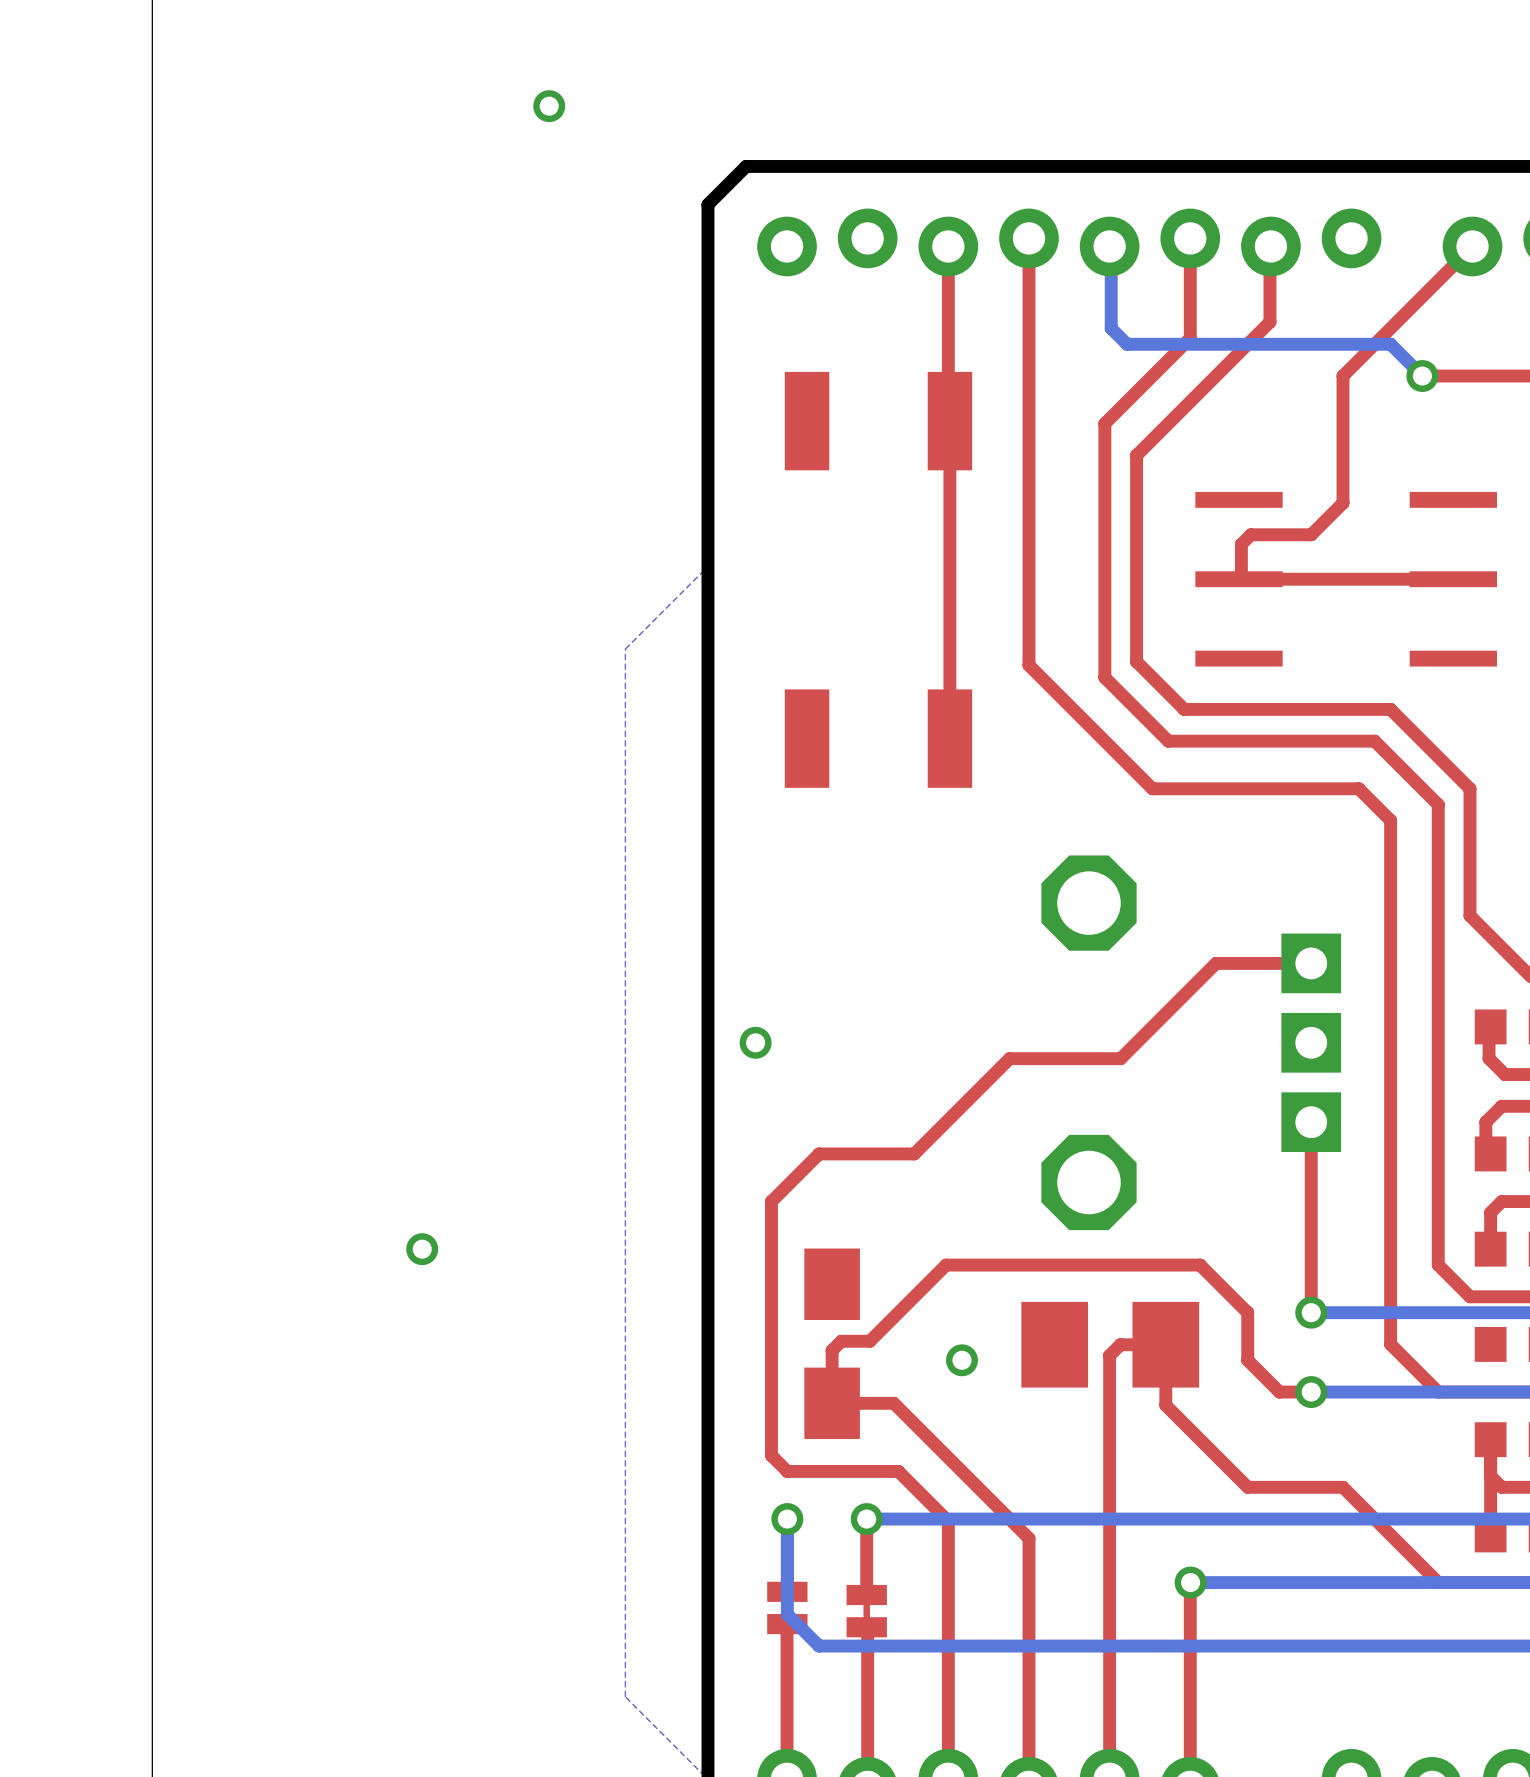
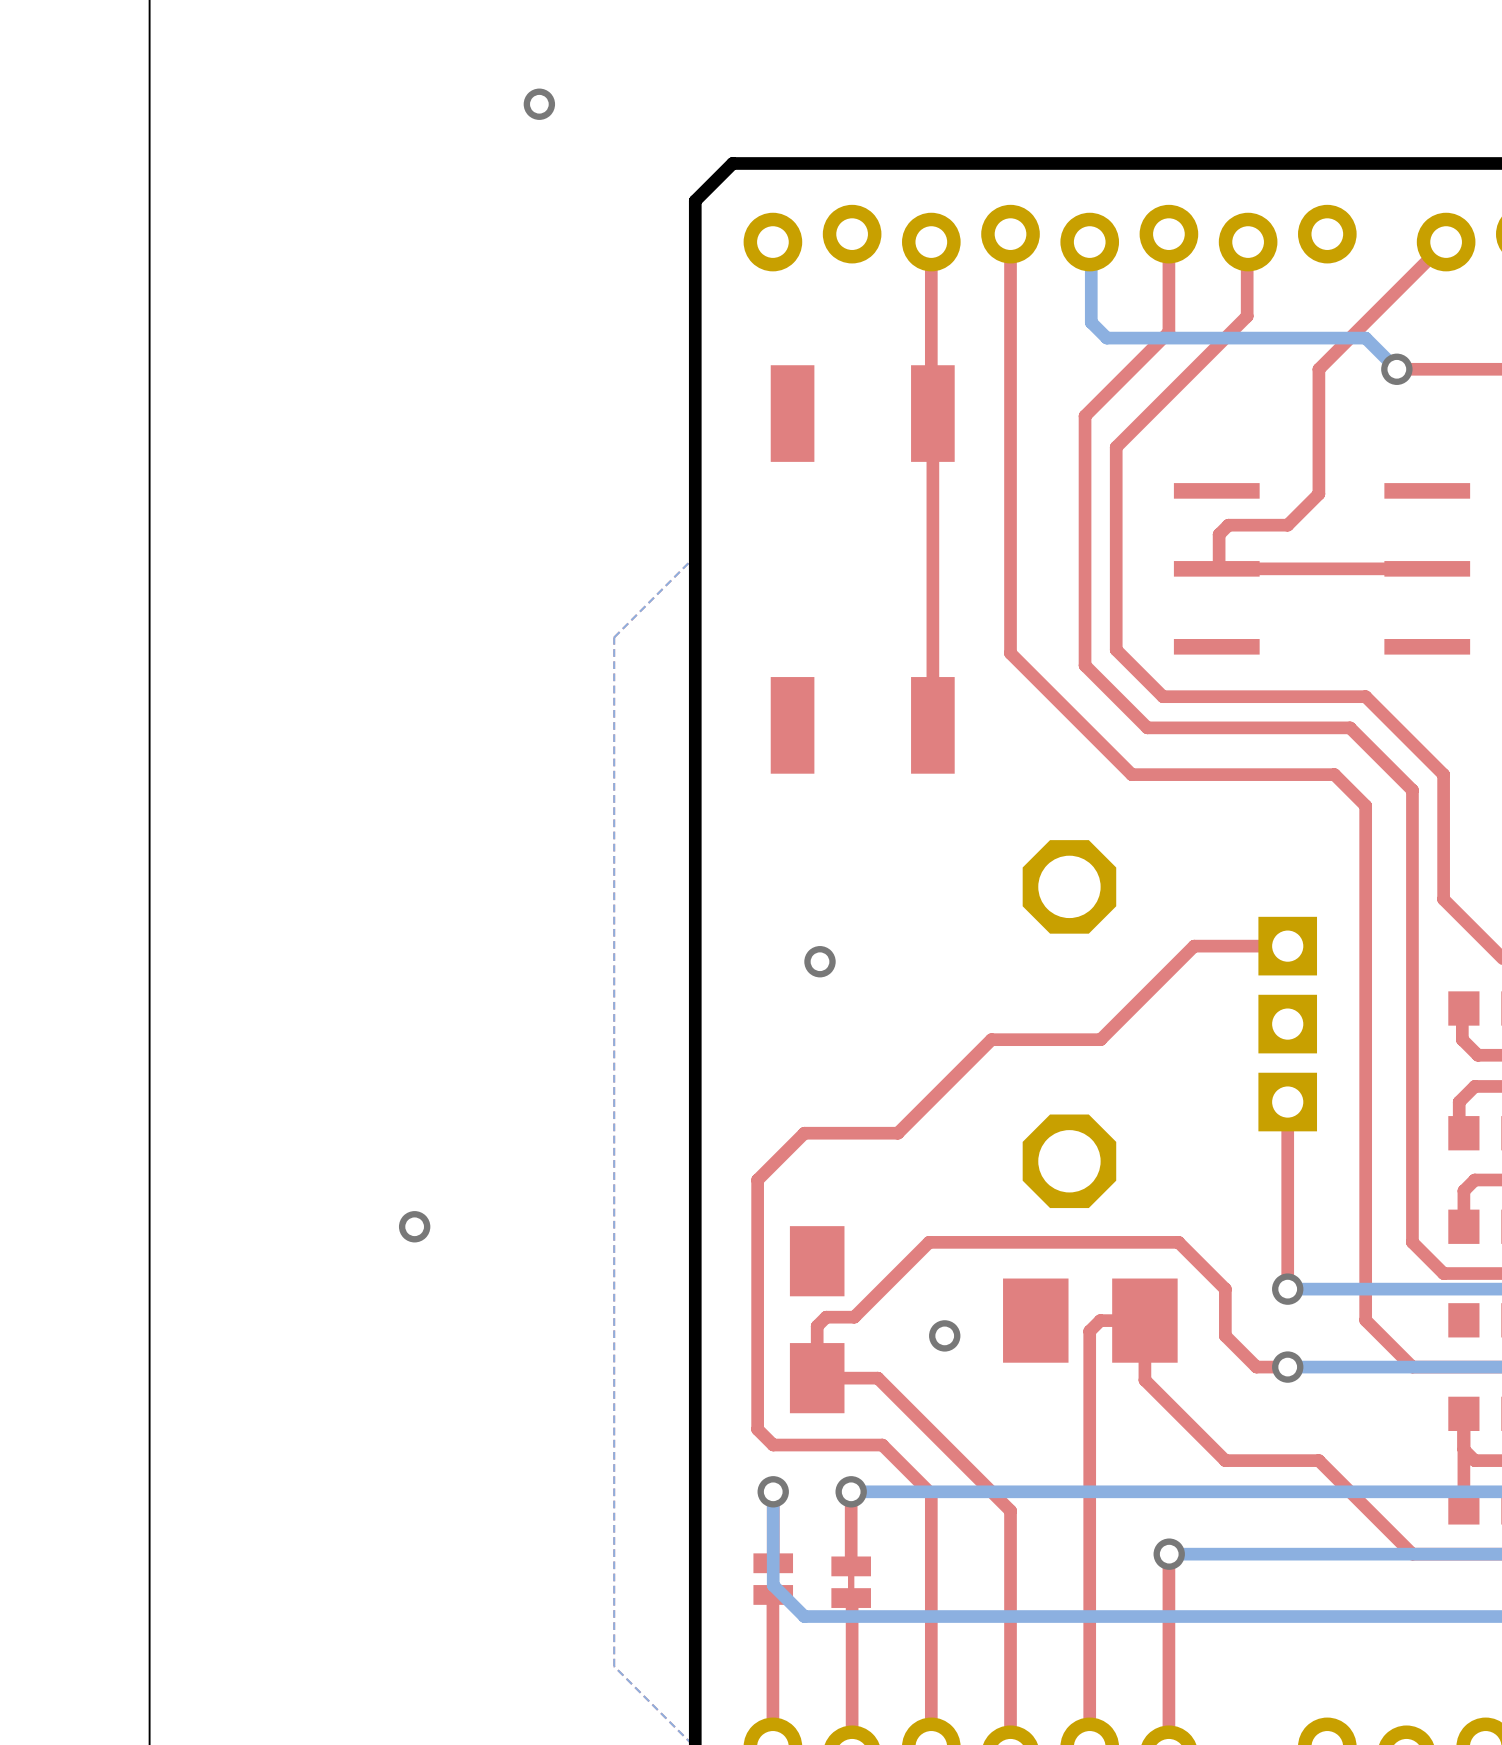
via position: (755, 1042) -> (820, 961)

